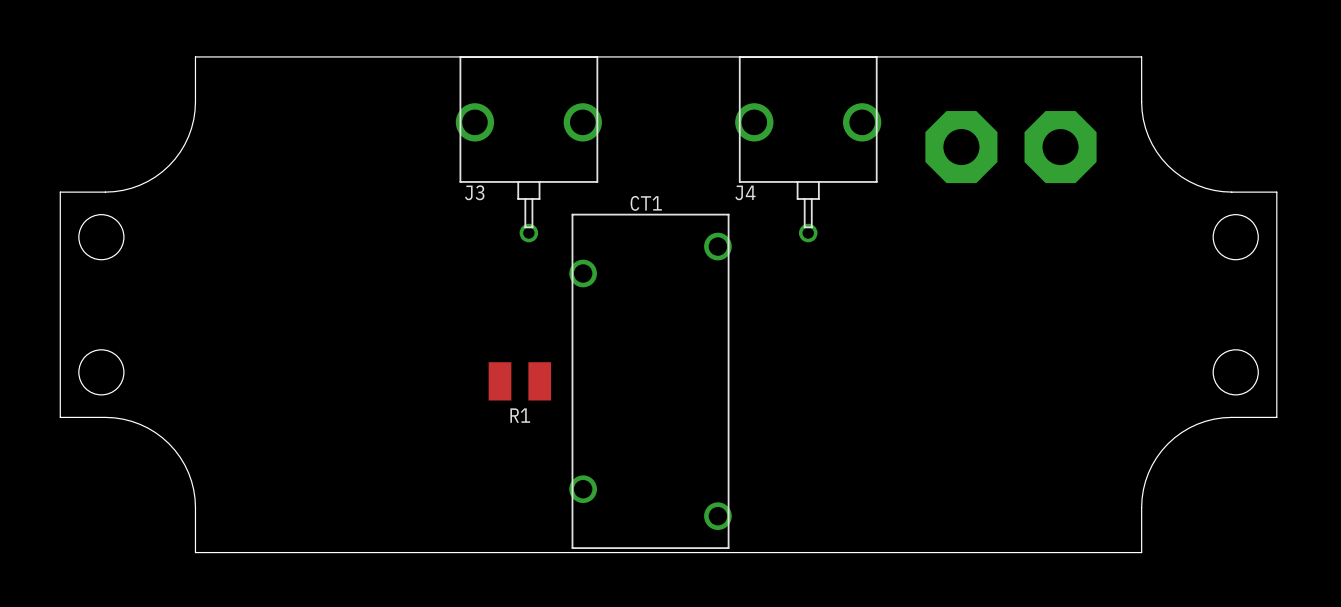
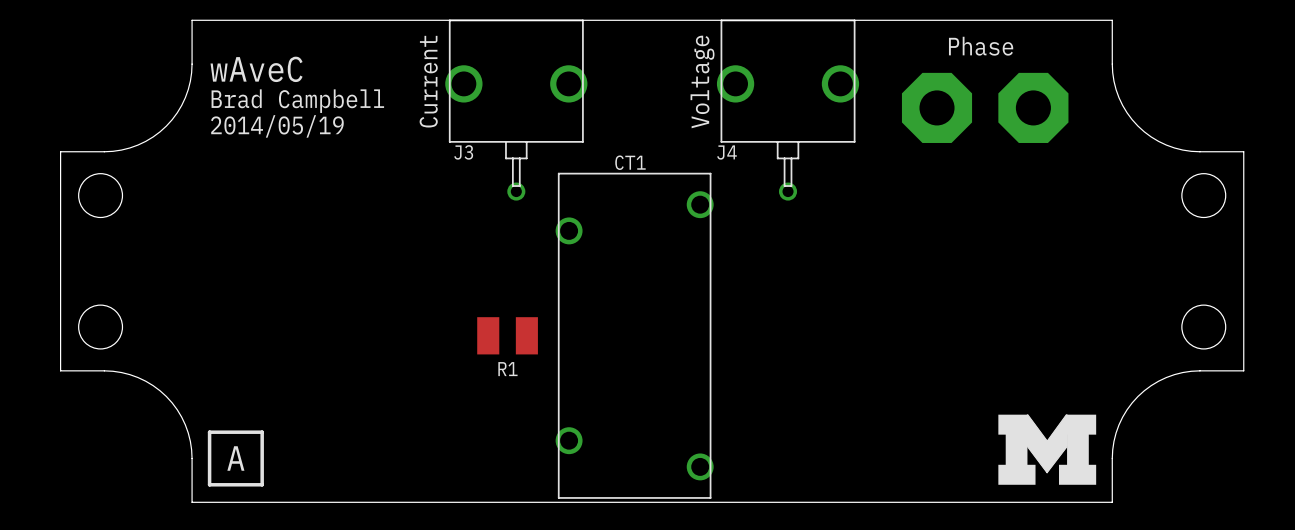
text: none -> Phase (981, 46)
text: none -> wAveC (256, 69)
text: none -> Current (428, 81)
text: none -> Voltage (702, 81)
text: none -> Brad Campbell (297, 101)
text: none -> 2014/05/19 (277, 126)
drawing: none -> [998, 414, 1097, 485]
line: none -> (209, 432) (262, 432) (262, 484) (209, 484) (209, 432)
text: none -> A (235, 458)

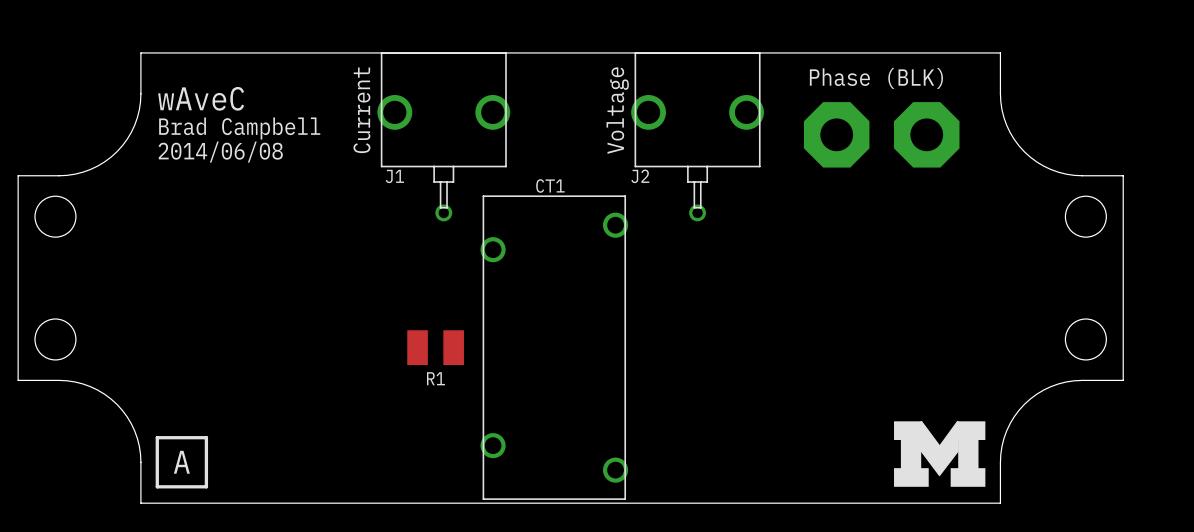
text: Phase (981, 46) -> Phase (BLK) (876, 78)
text: 2014/05/19 (277, 126) -> 2014/06/08 (220, 152)
J3 name: J3 (463, 152) -> J1 (394, 176)
J4 name: J4 (726, 152) -> J2 (640, 176)

